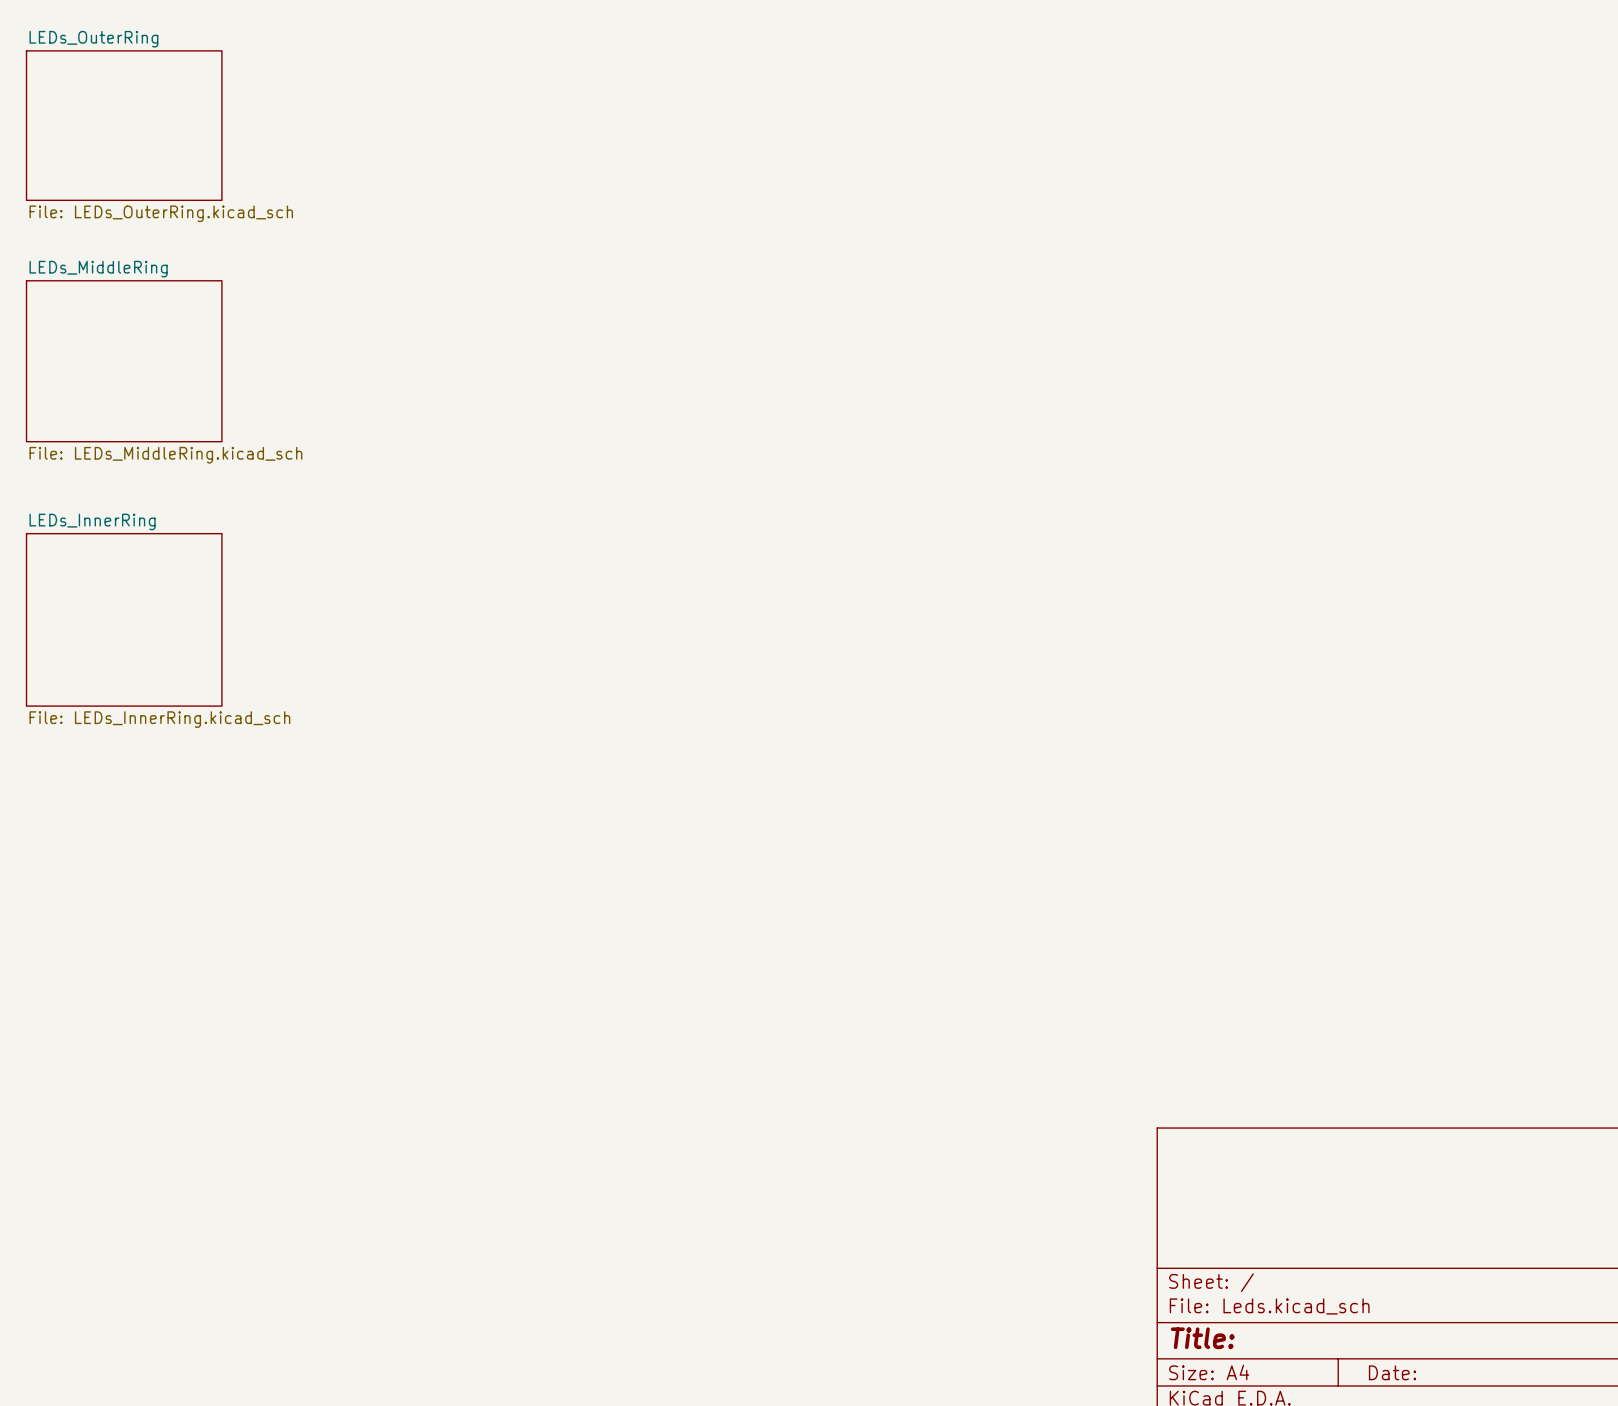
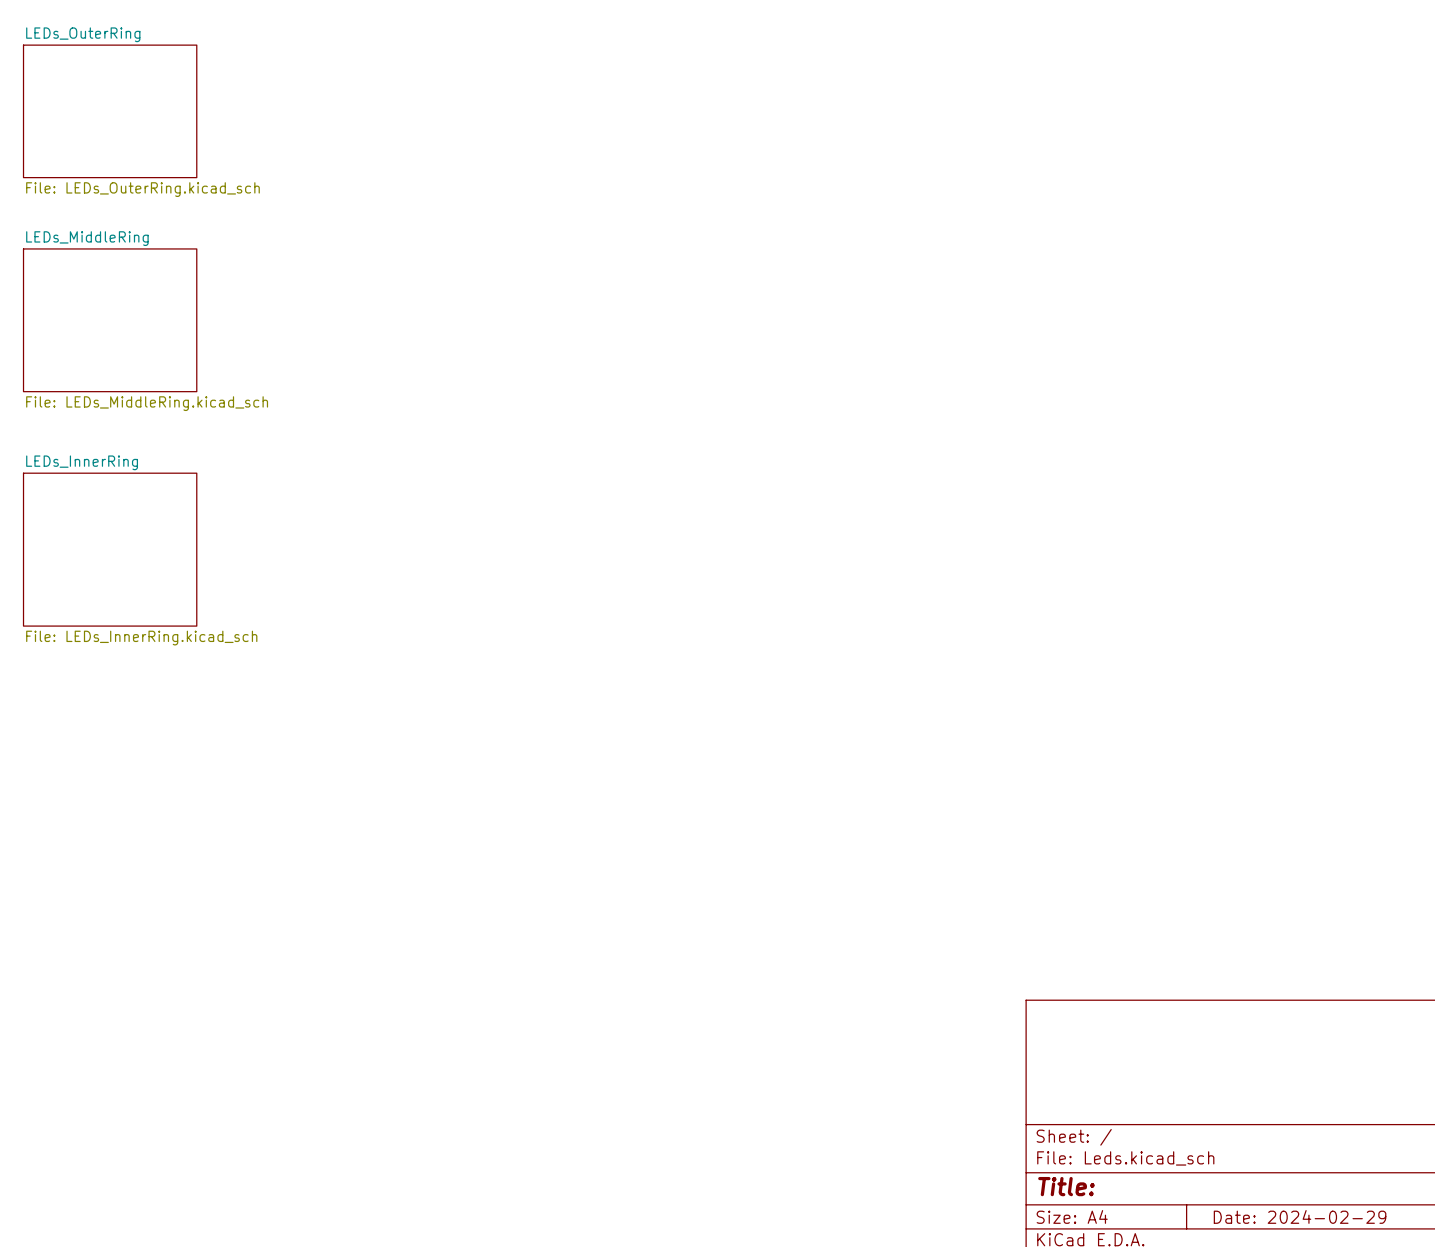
title block: Date: (1392, 1372) -> Date: 2024-02-29 (1300, 1216)

